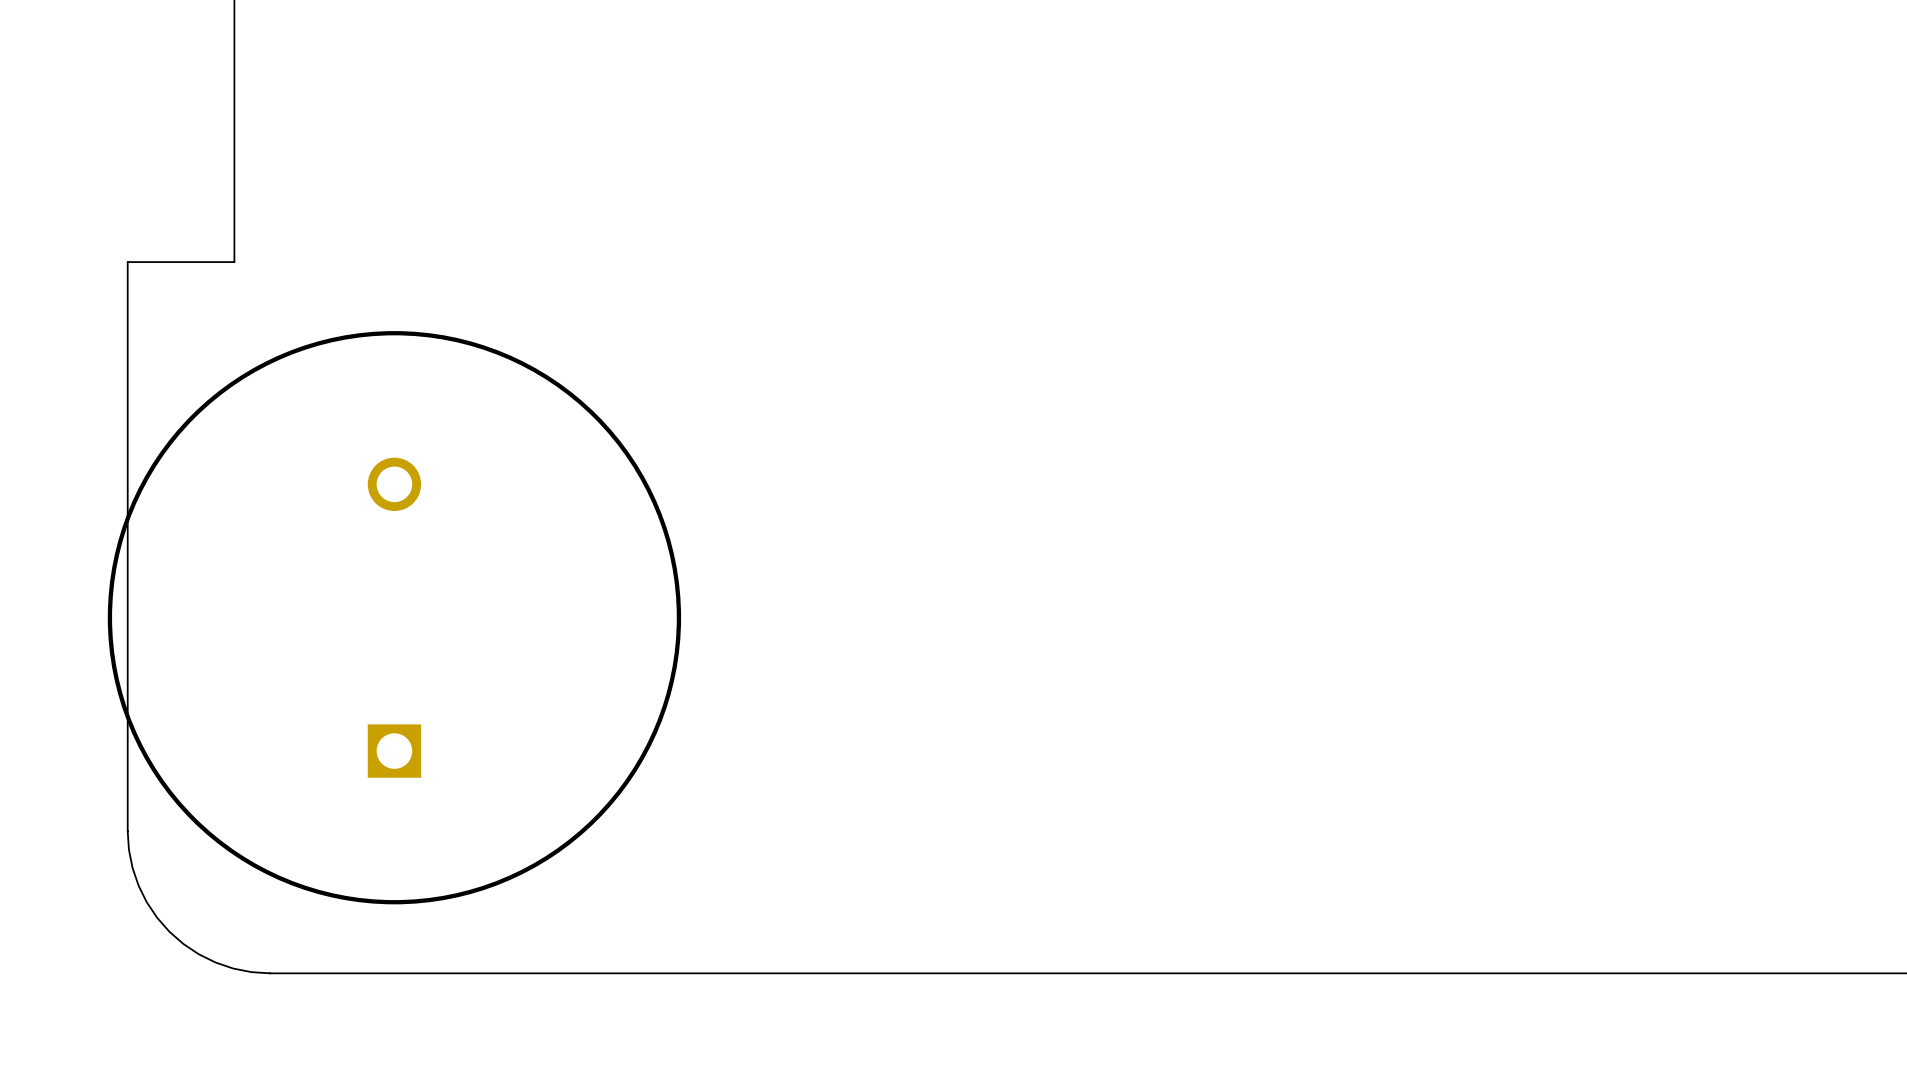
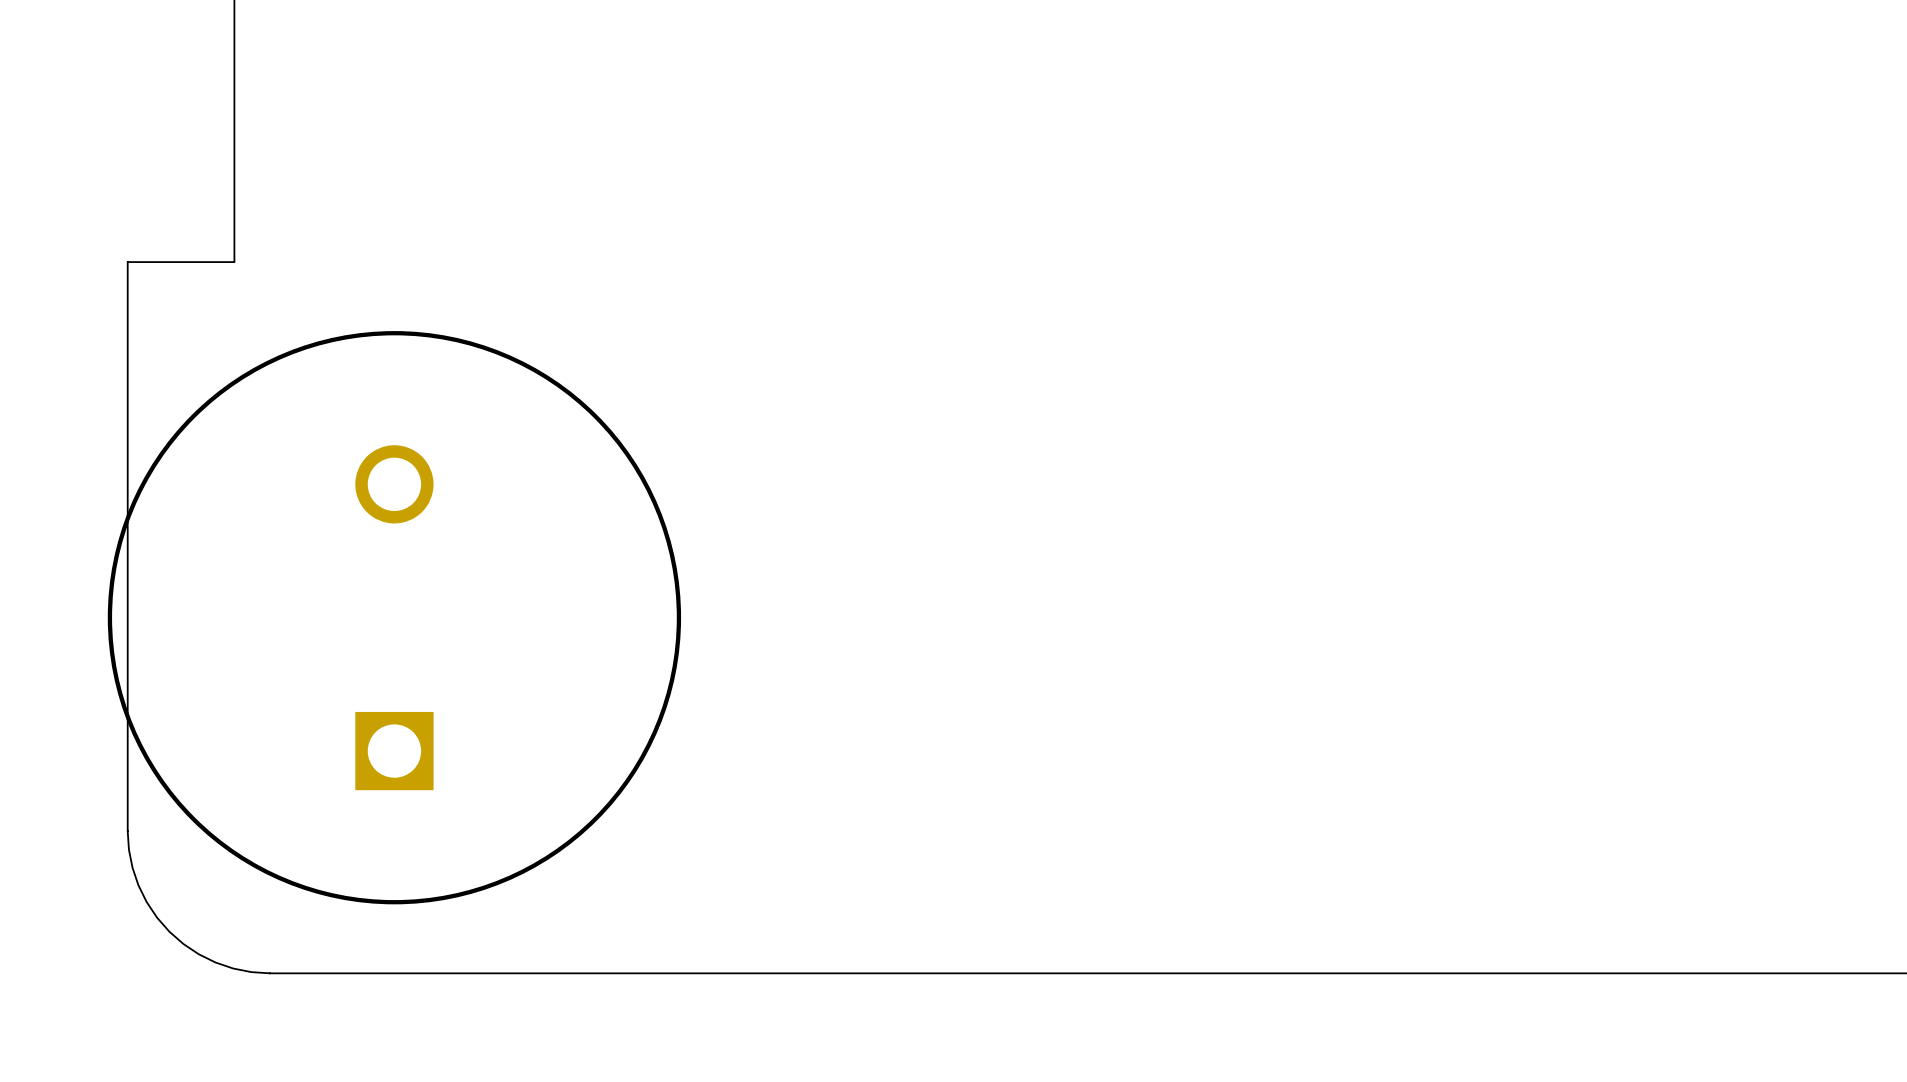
part footprint: [107, 331, 682, 905] -> [107, 331, 682, 905]

